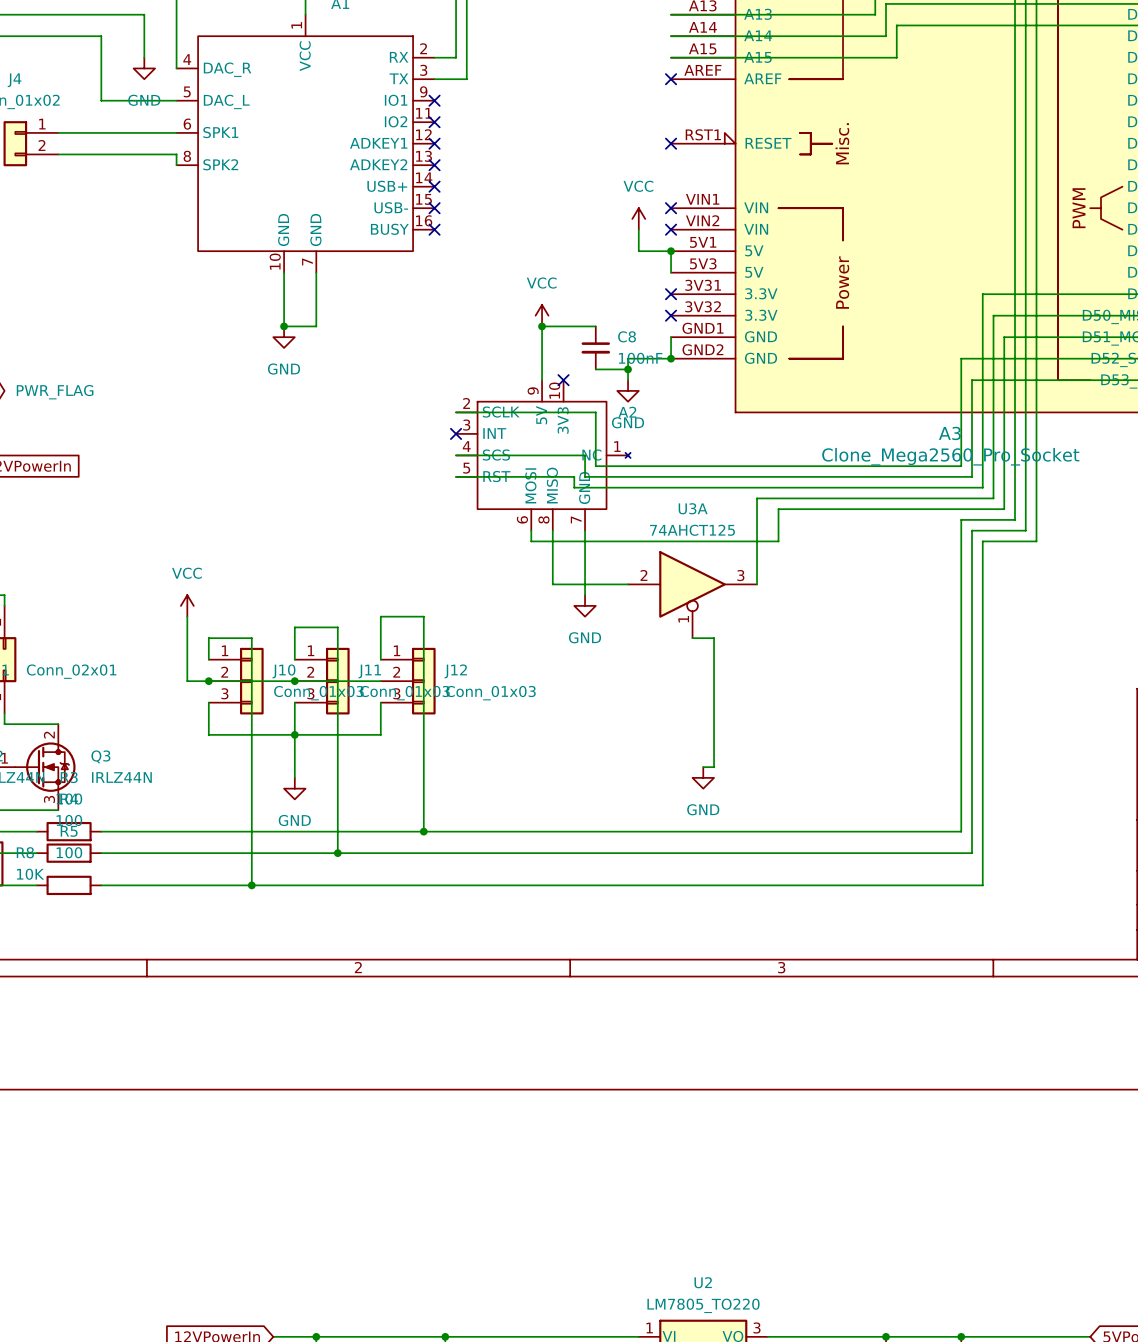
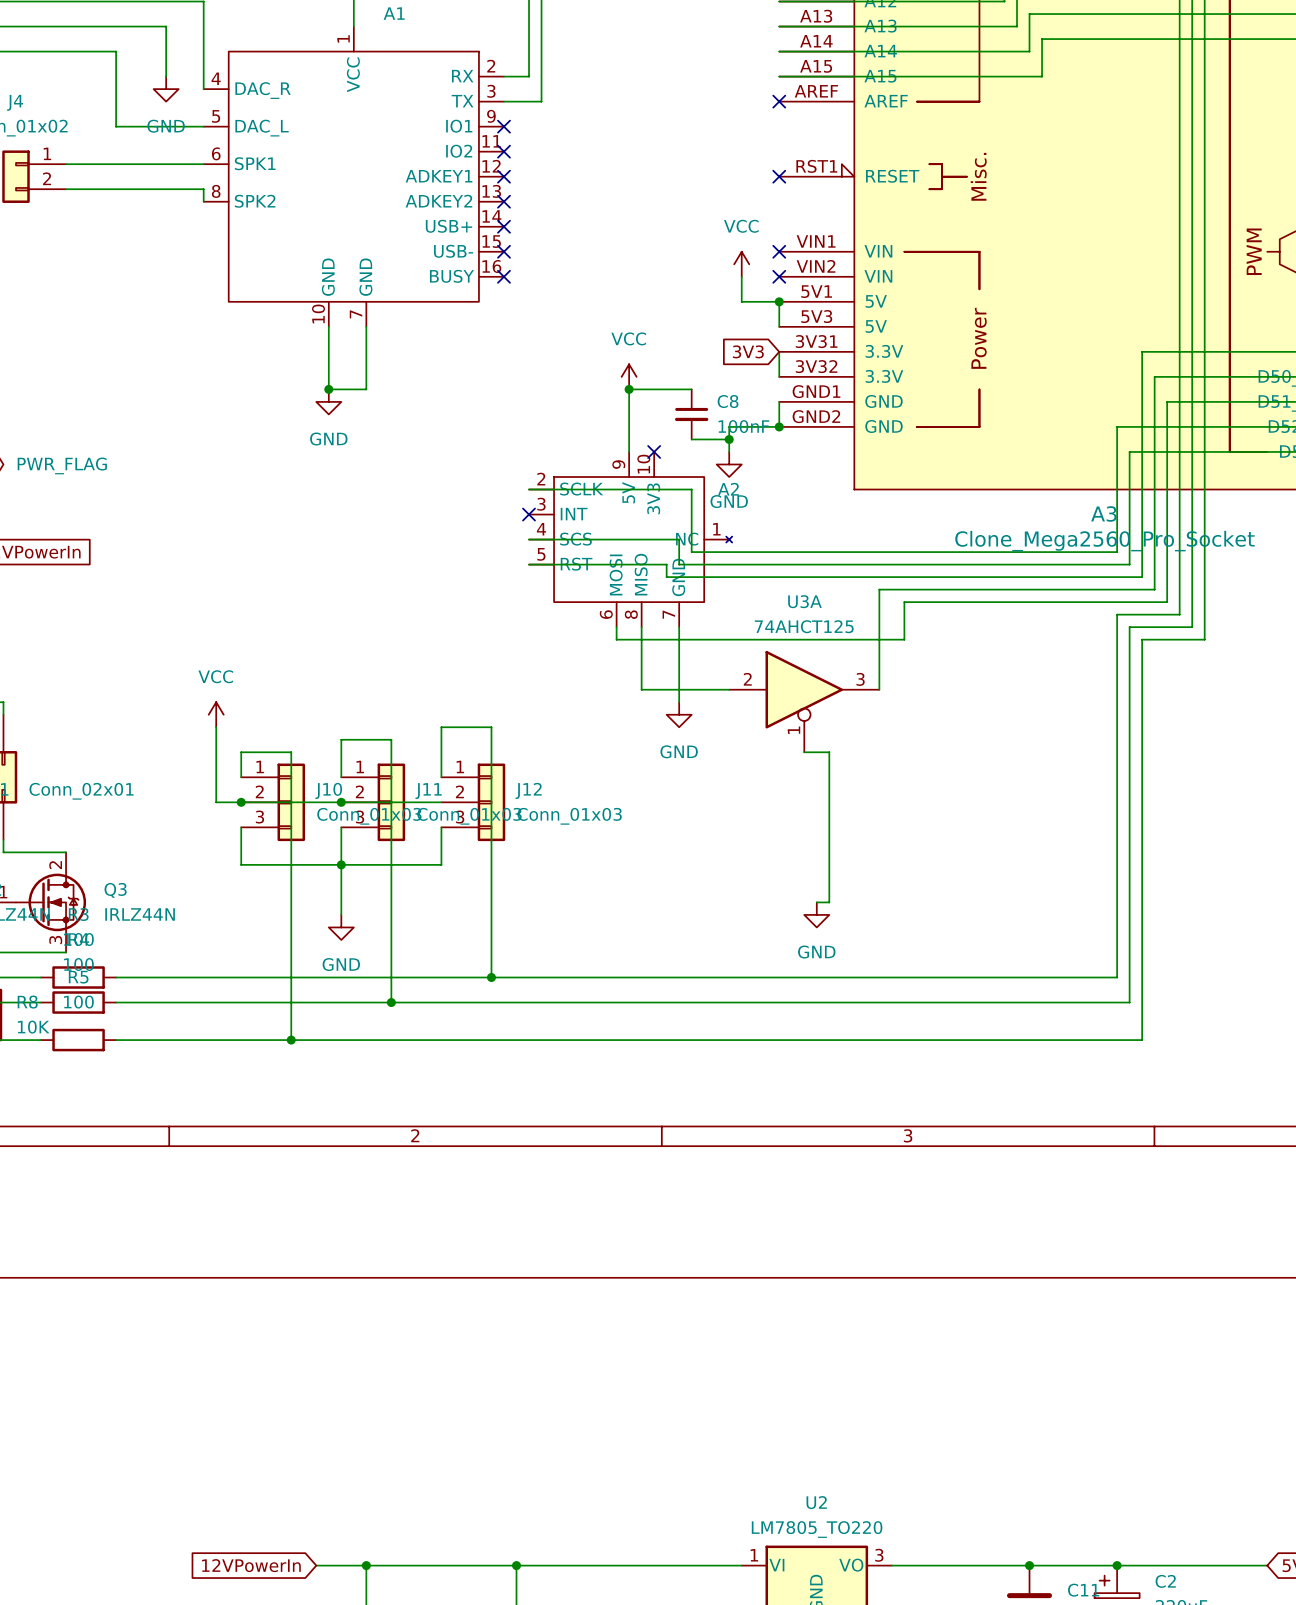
global label: none -> 3V3 (748, 351)
wire: none -> (779, 351) (779, 376)
no-connect mark: (671, 294) -> none
no-connect mark: (671, 315) -> none

